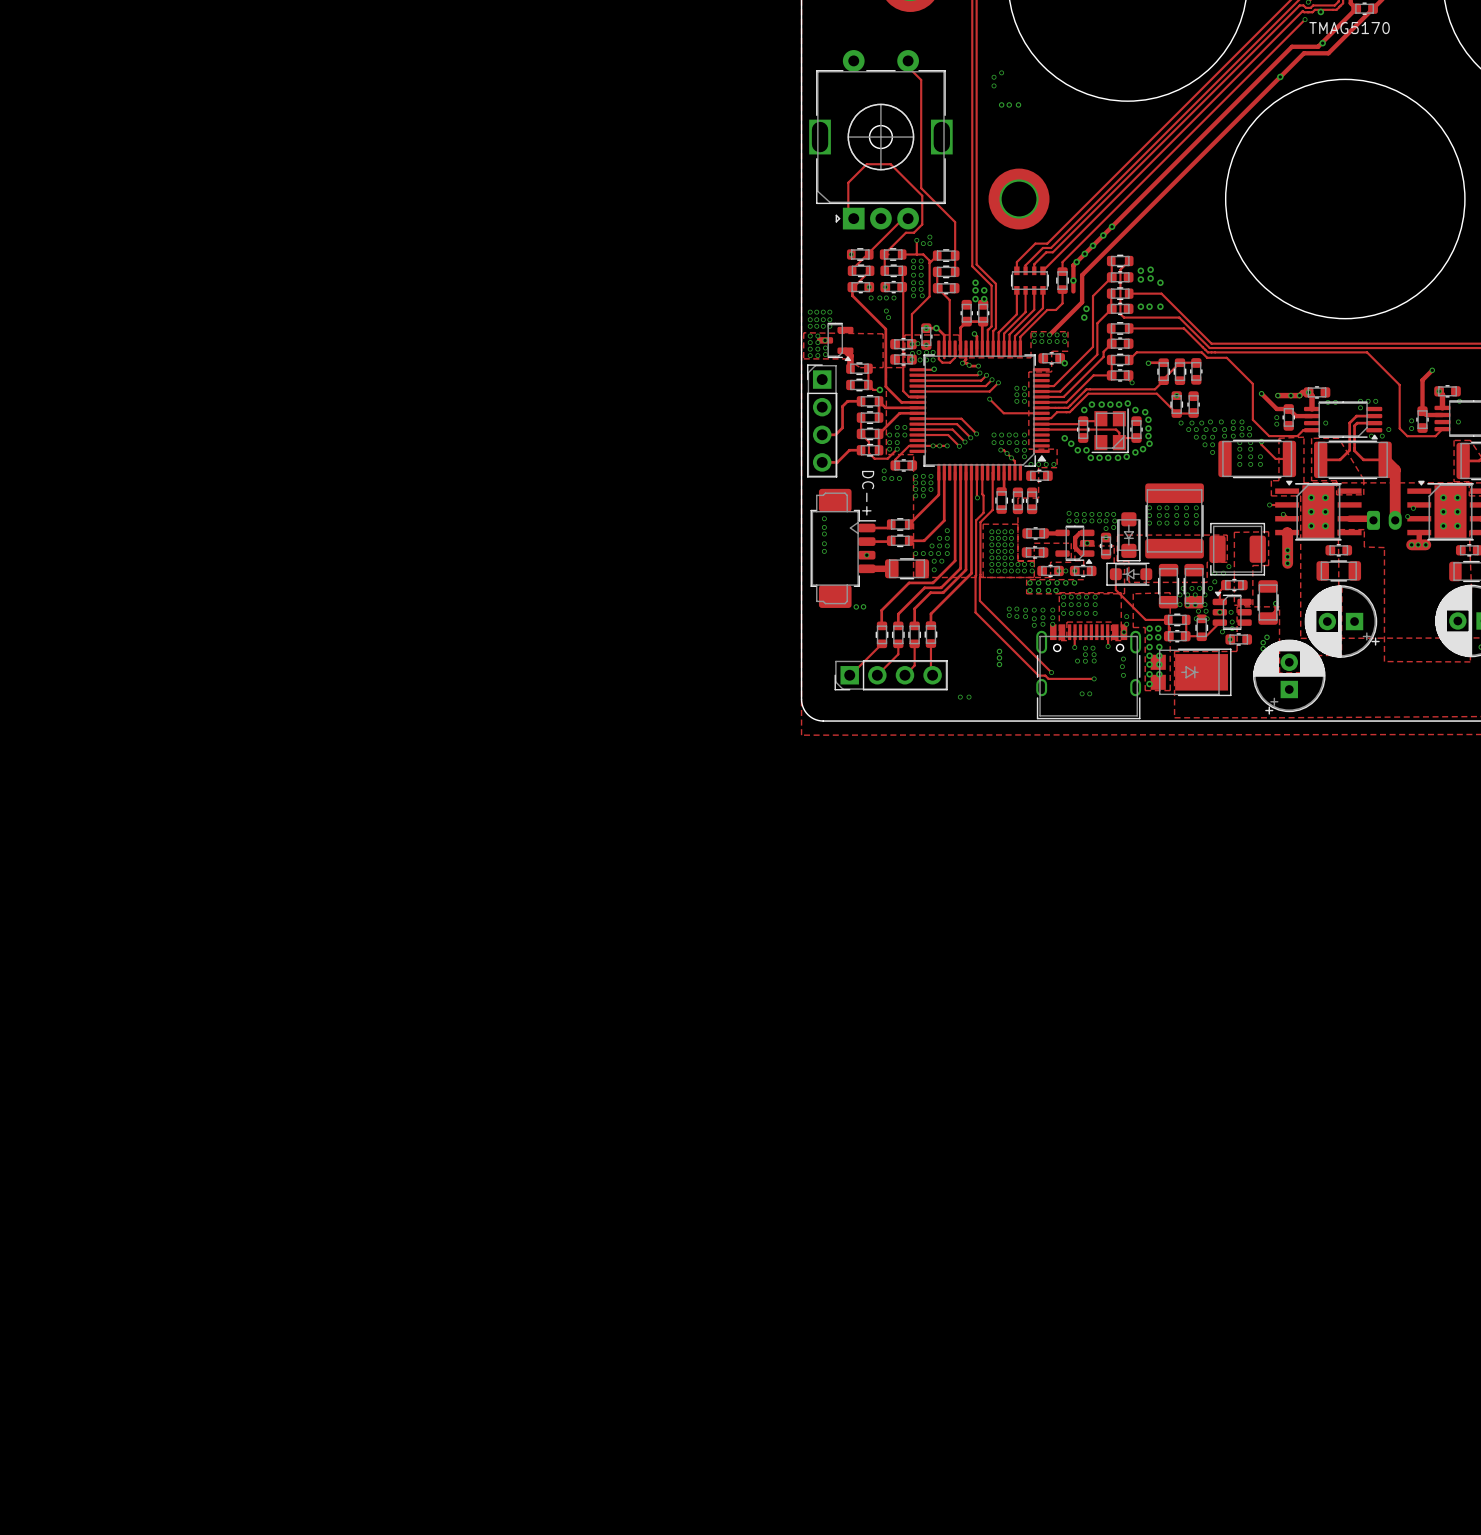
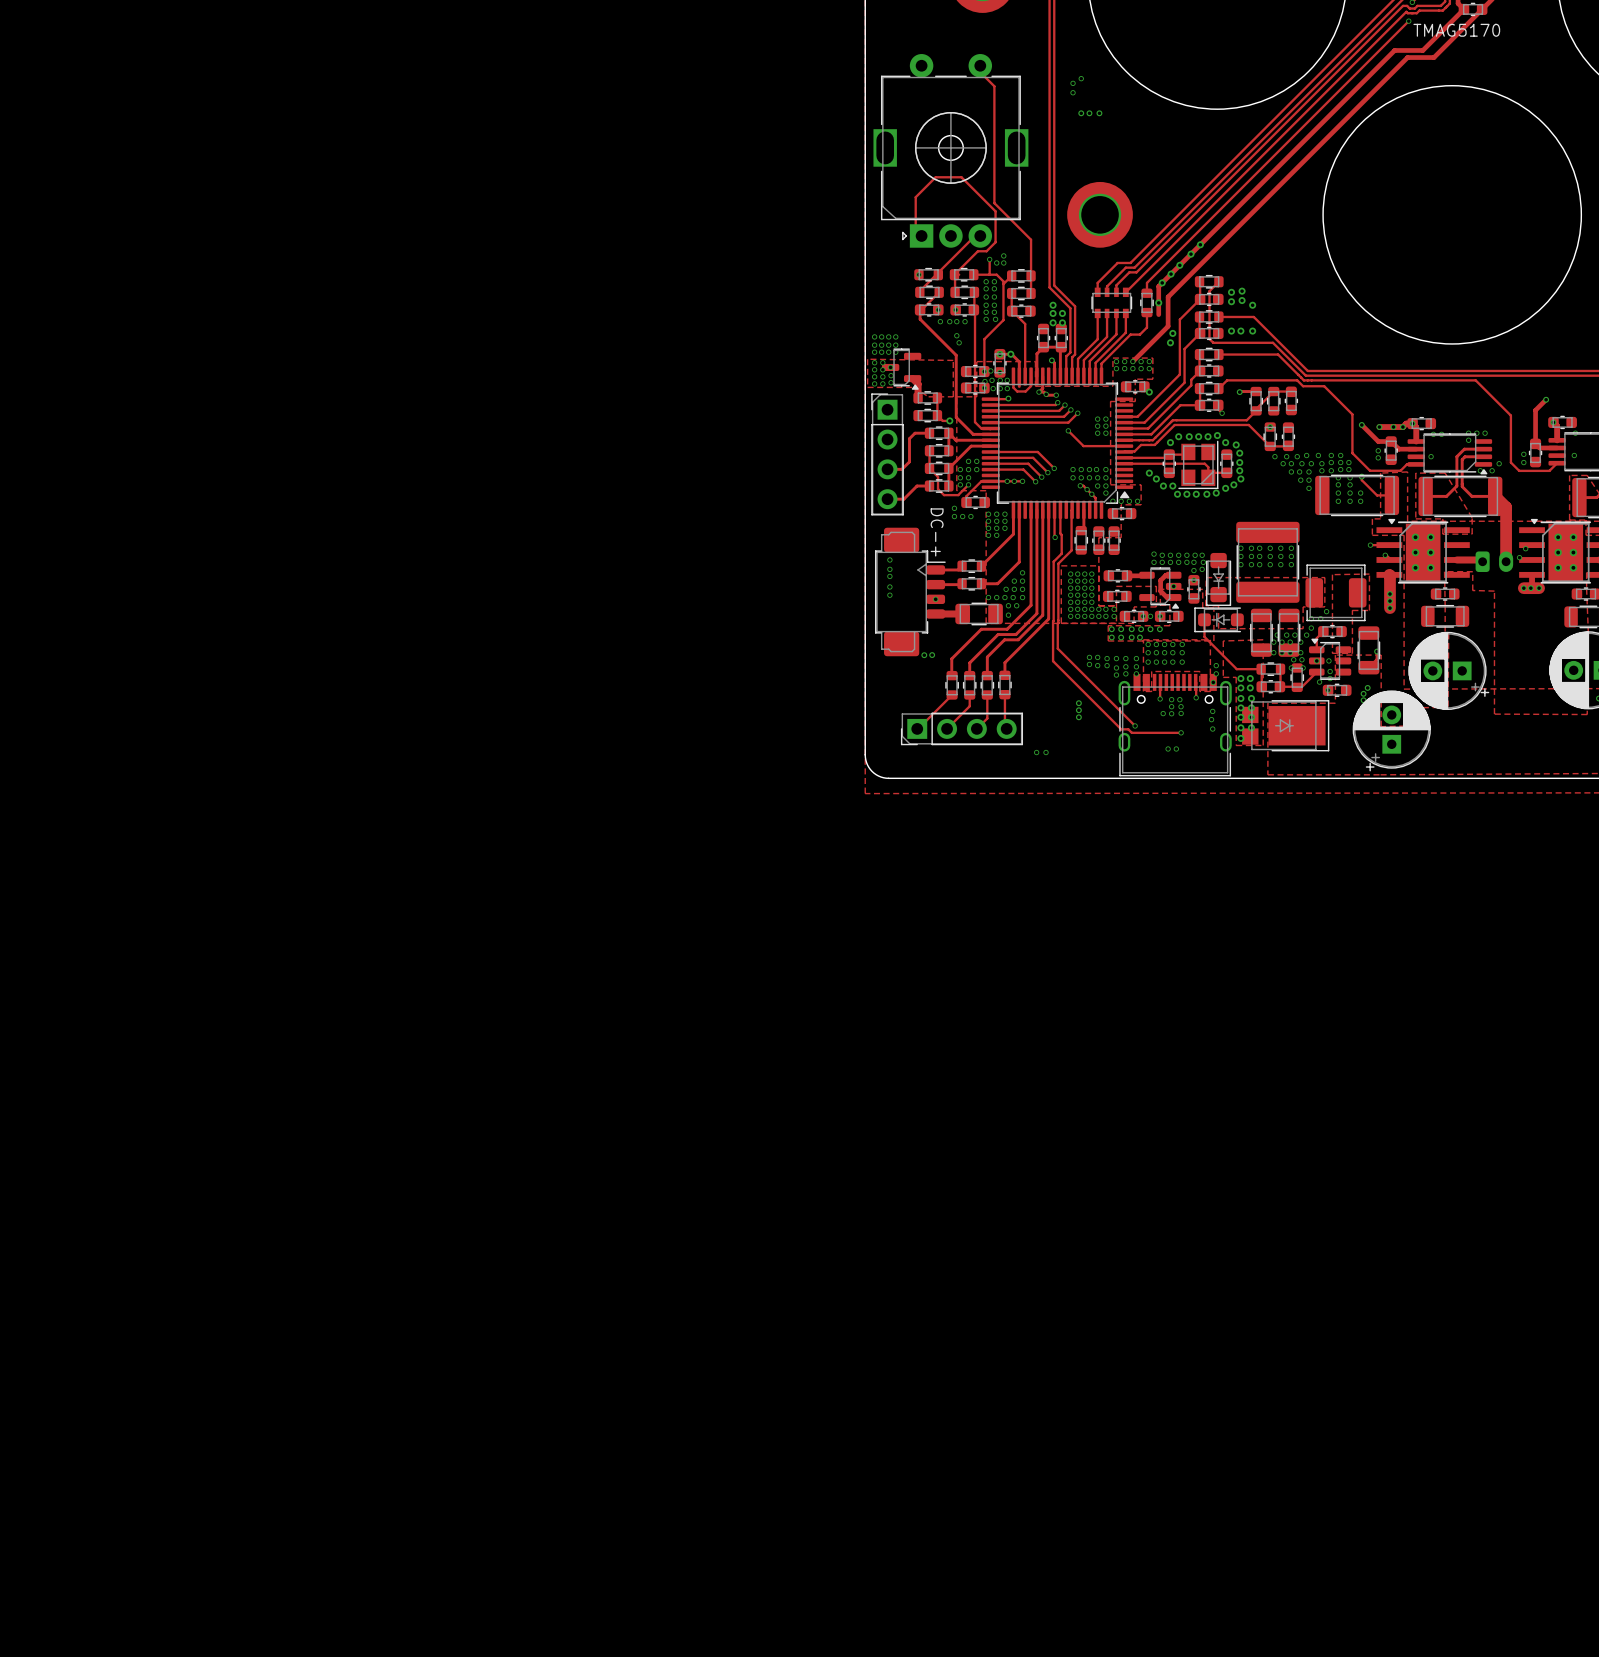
via: (1320, 11) -> none
via: (1322, 43) -> none
via: (1280, 76) -> none

